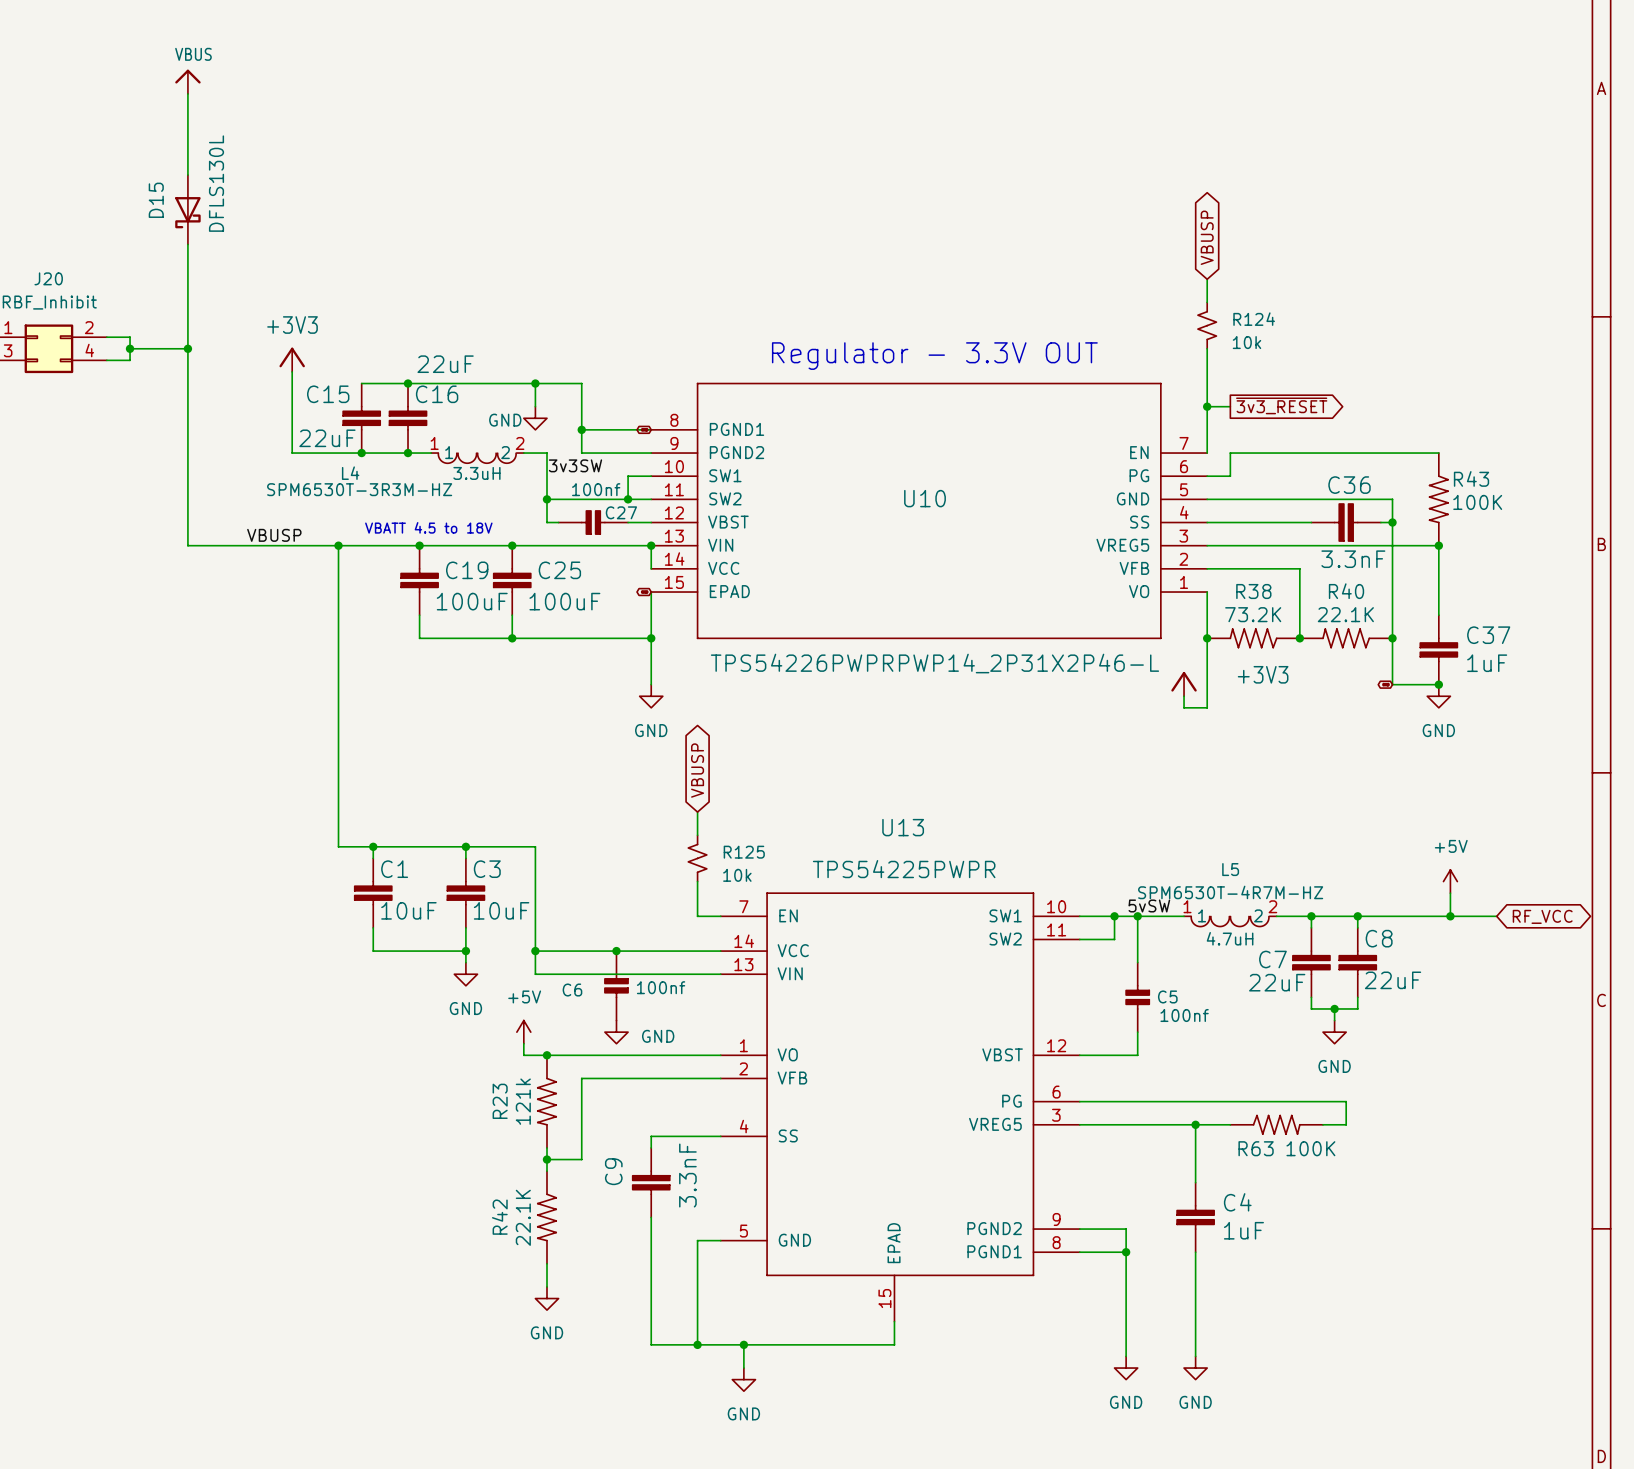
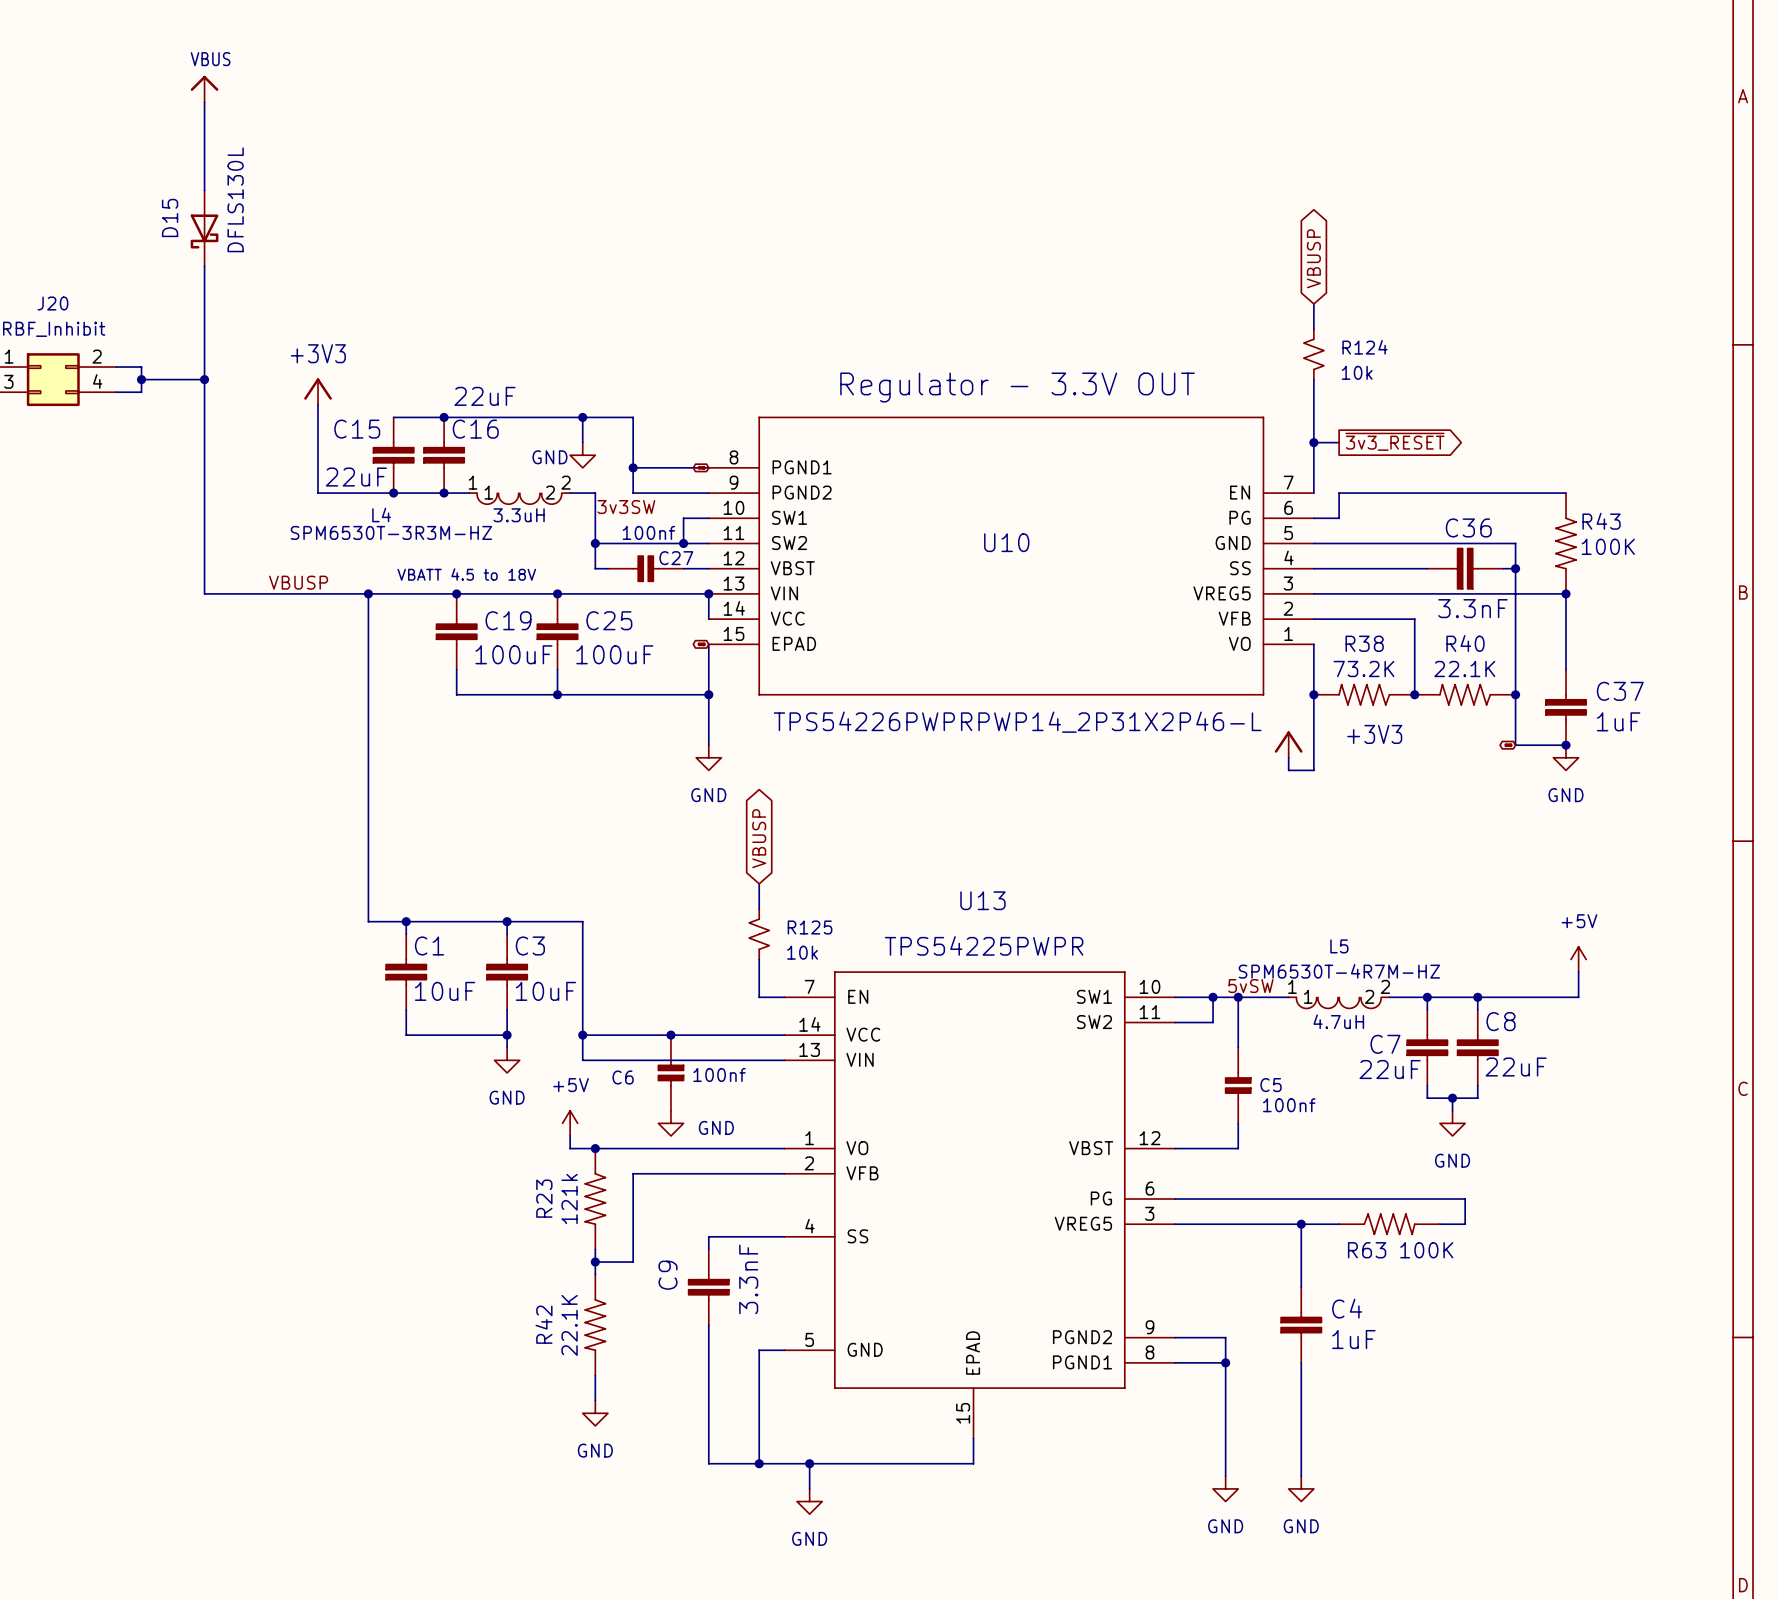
wire: (1450, 916) (1496, 916) -> none
junction: (1450, 916) -> none
global label: RF_VCC (1542, 916) -> none

